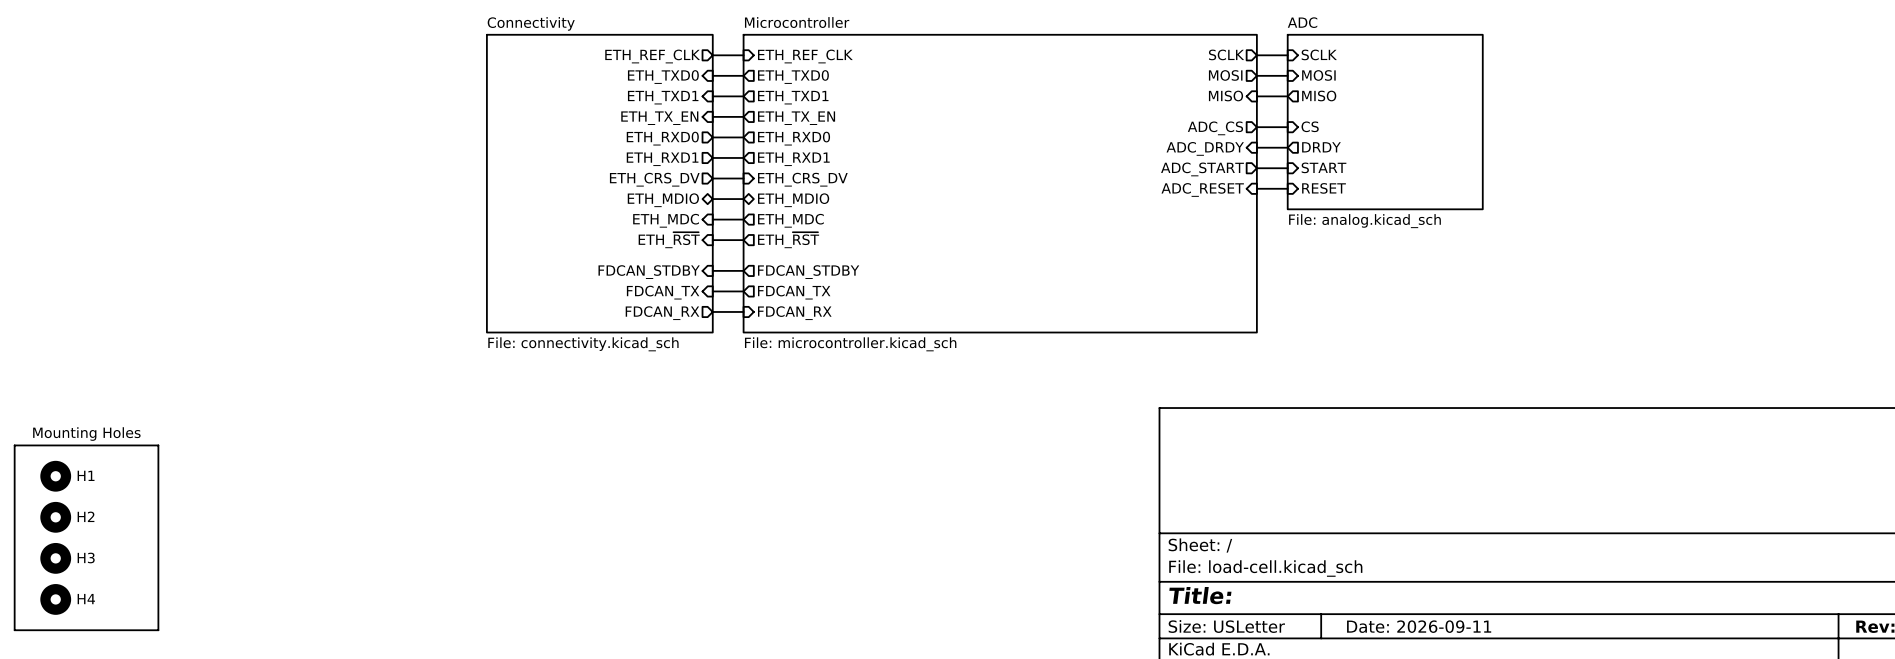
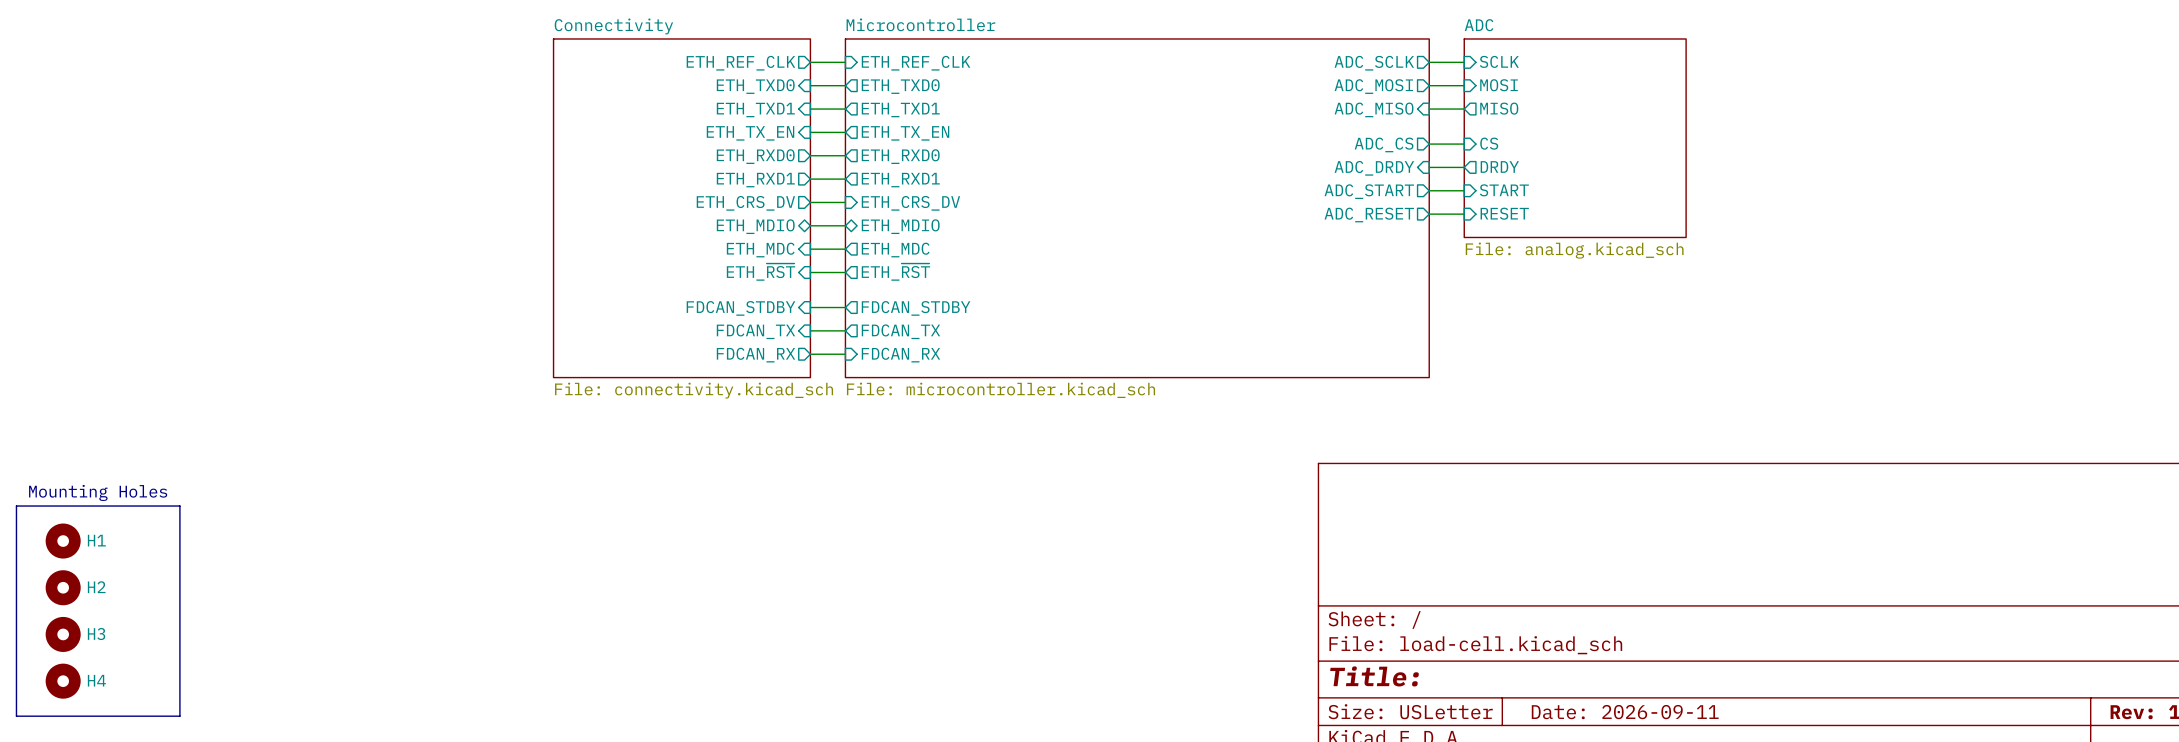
sheet pin: SCLK (1226, 54) -> ADC_SCLK (1374, 63)
sheet pin: MOSI (1225, 75) -> ADC_MOSI (1373, 86)
sheet pin: MISO (1226, 96) -> ADC_MISO (1374, 109)
sheet pin shape: input (1202, 189) -> output (1369, 215)

